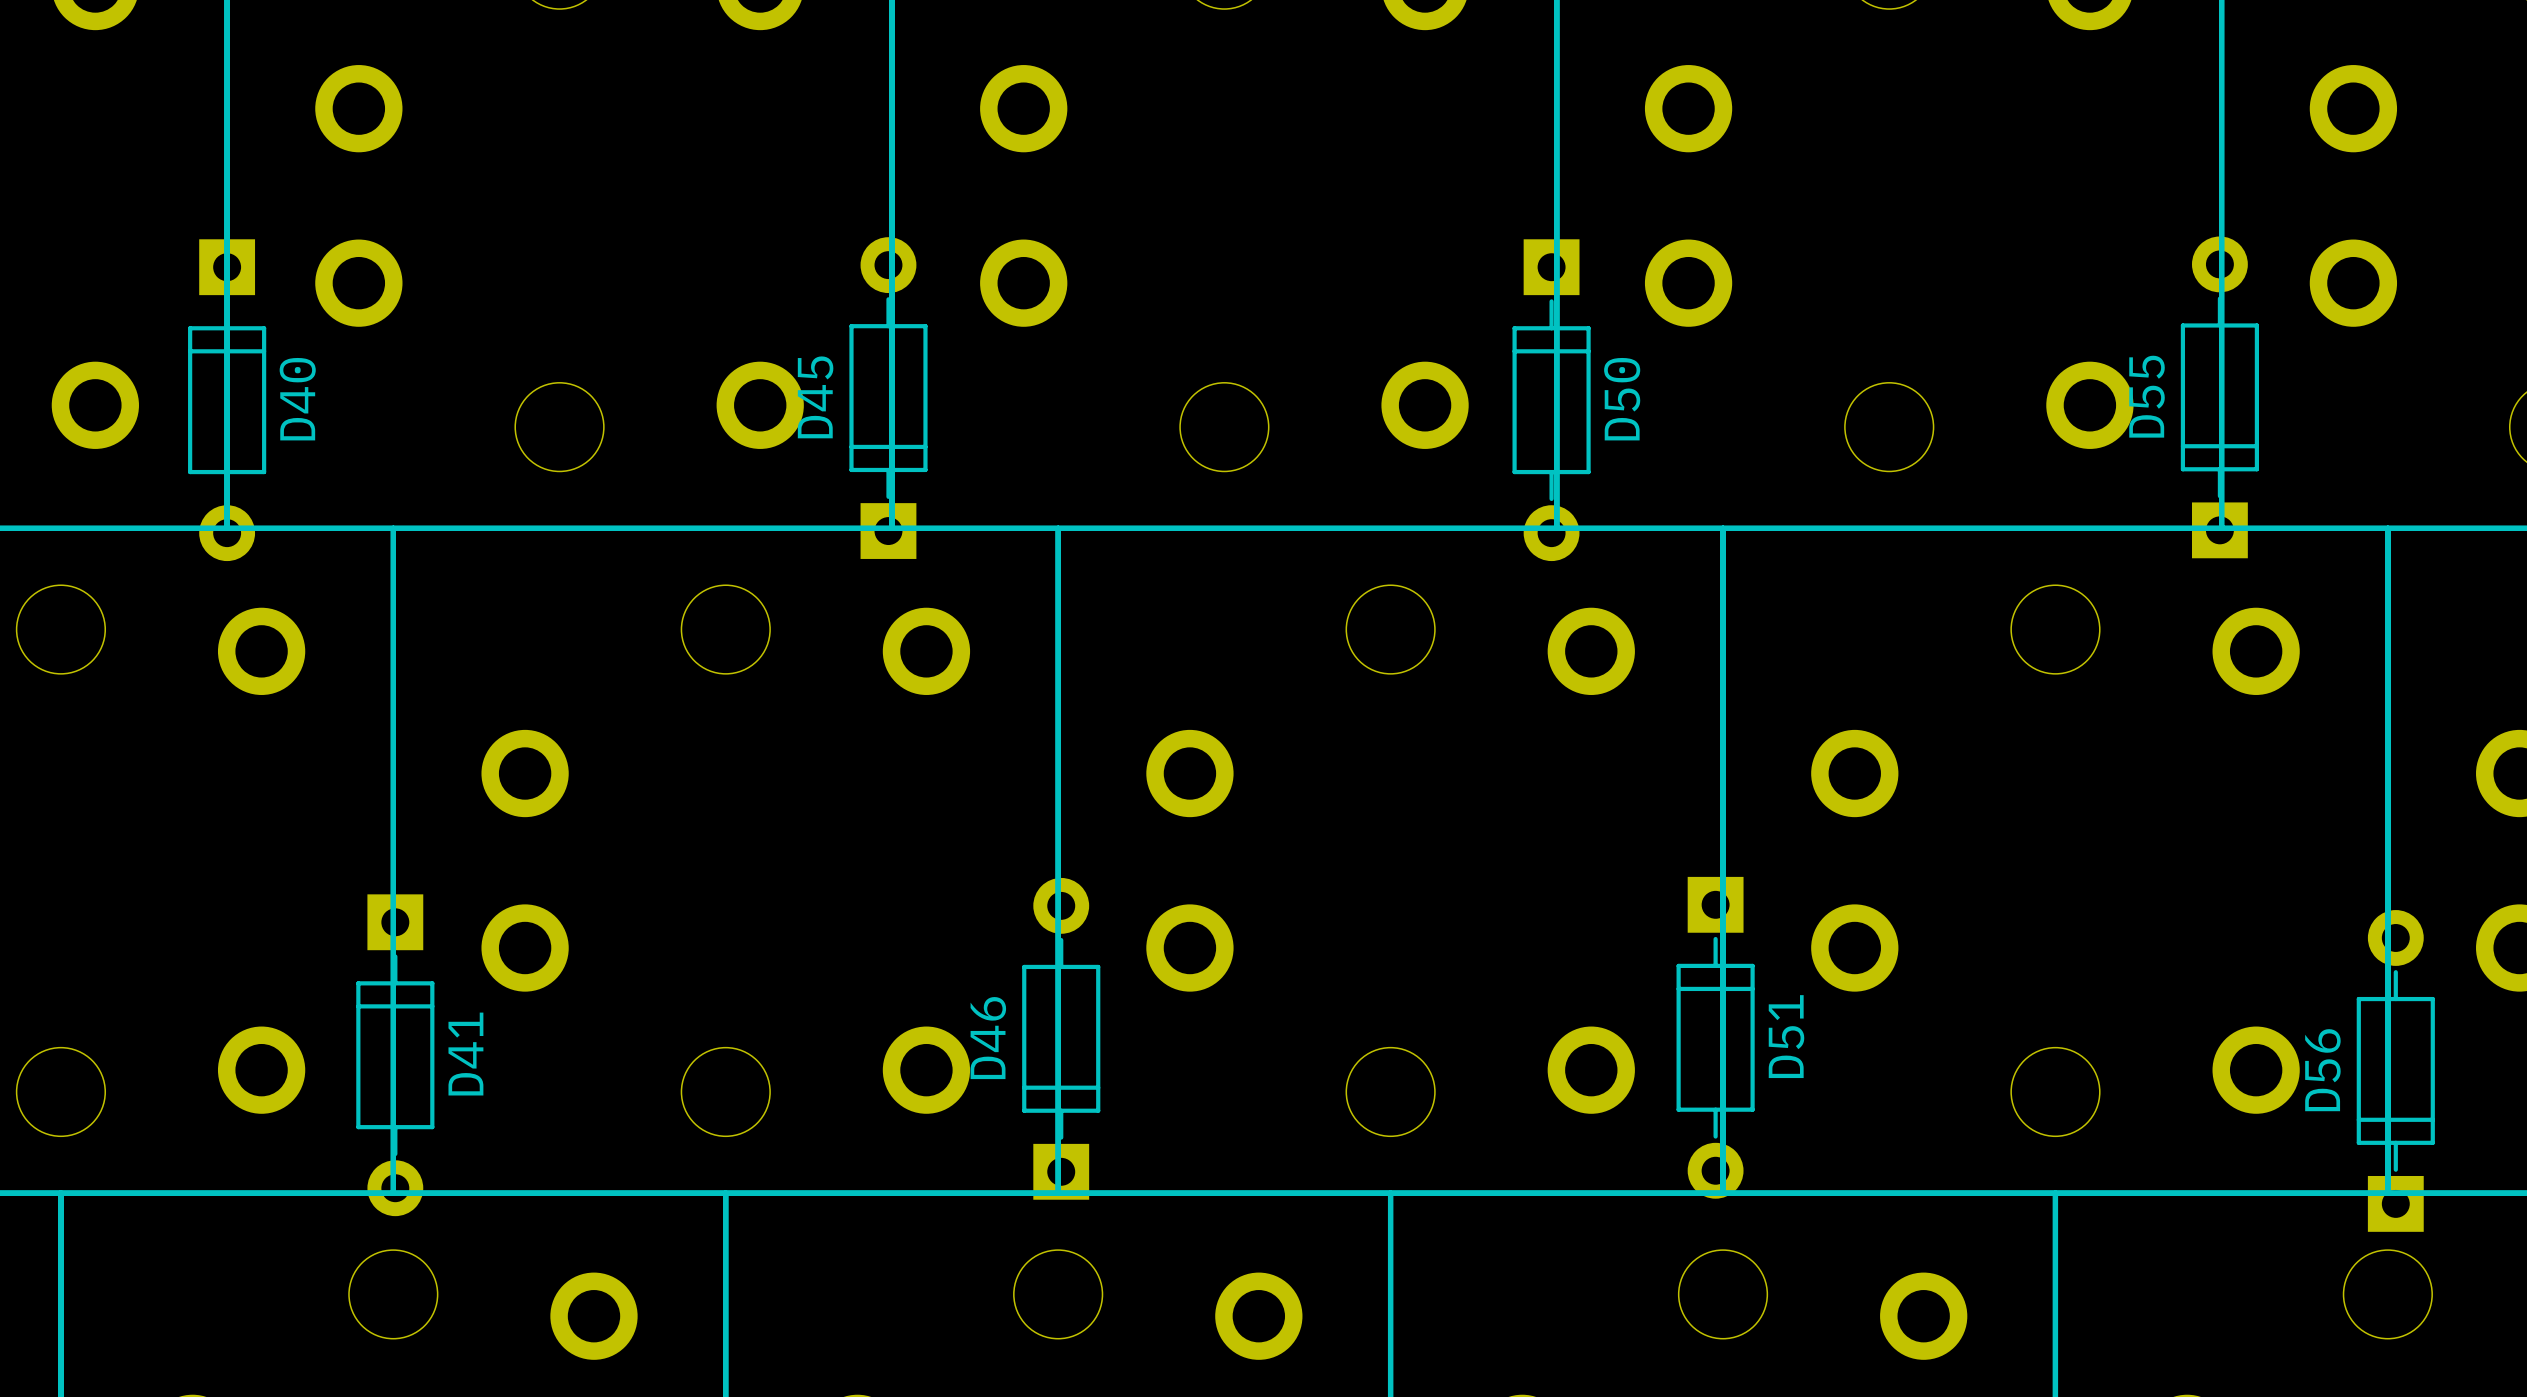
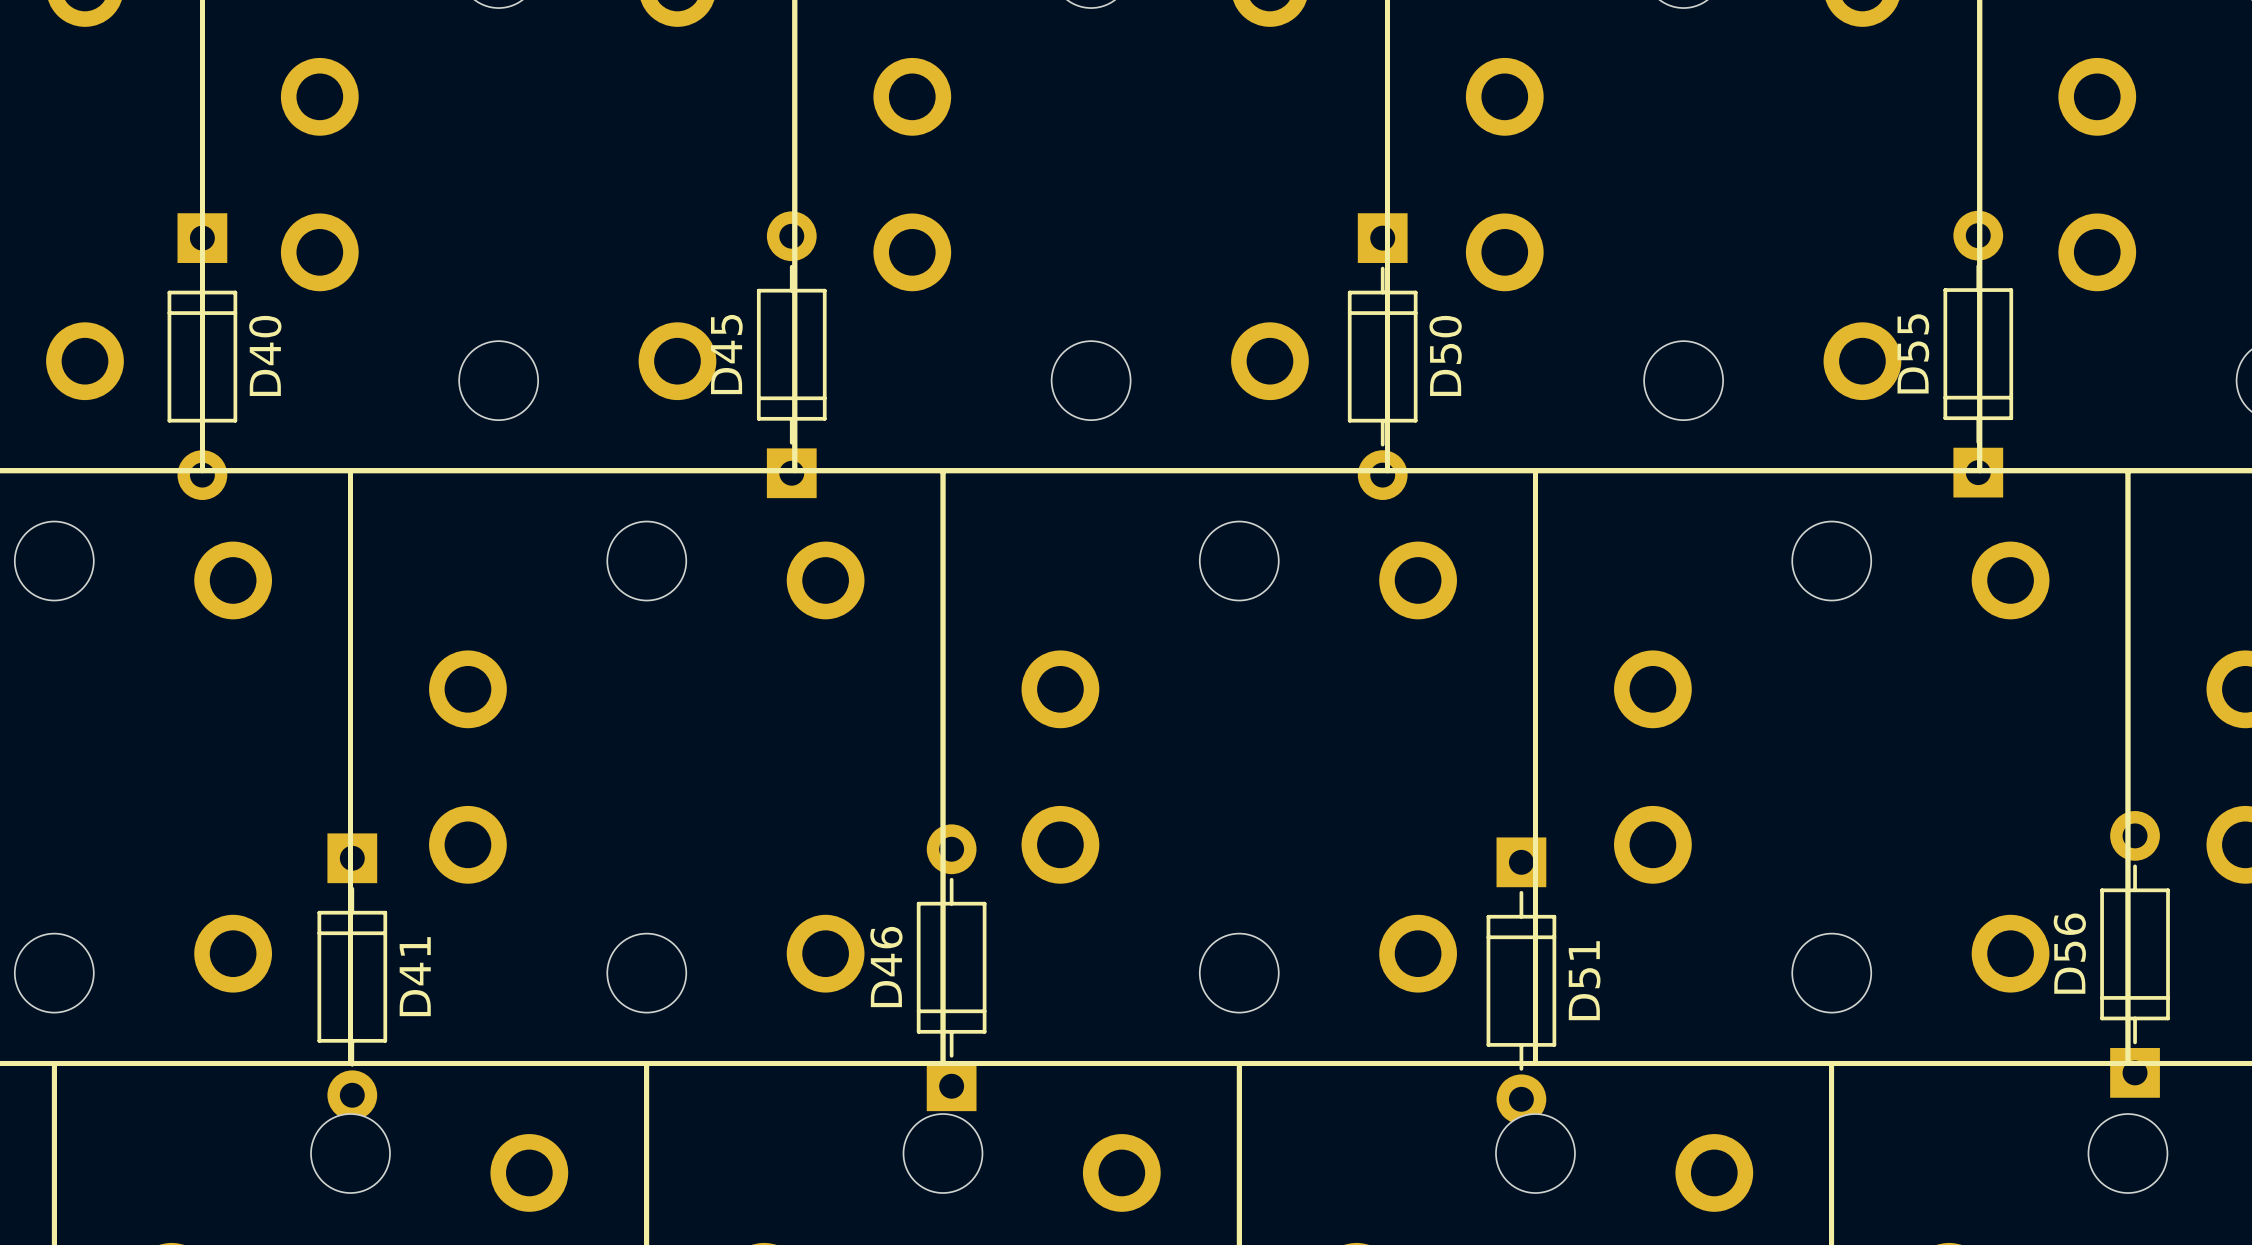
D51 position: (1715, 1037) -> (1521, 980)
D46 position: (1061, 1038) -> (951, 967)
D41 position: (395, 1055) -> (352, 976)

